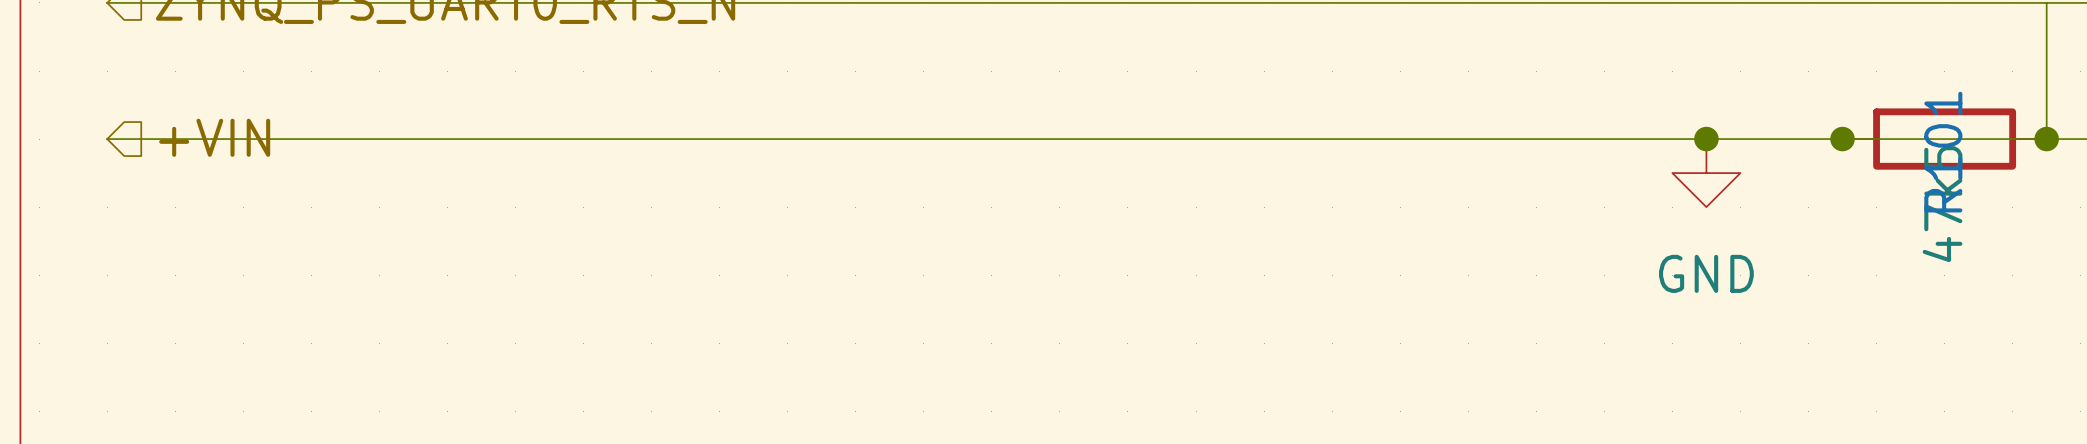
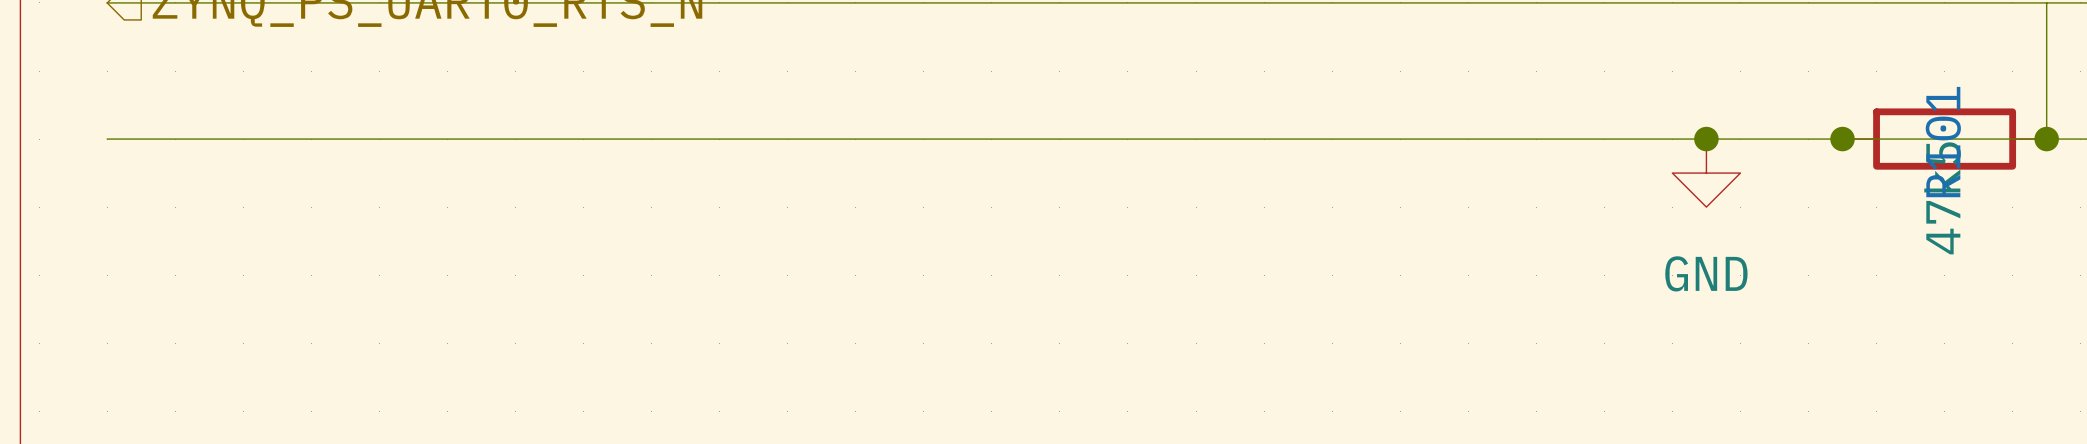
hierarchical label: +VIN (214, 137) -> none

